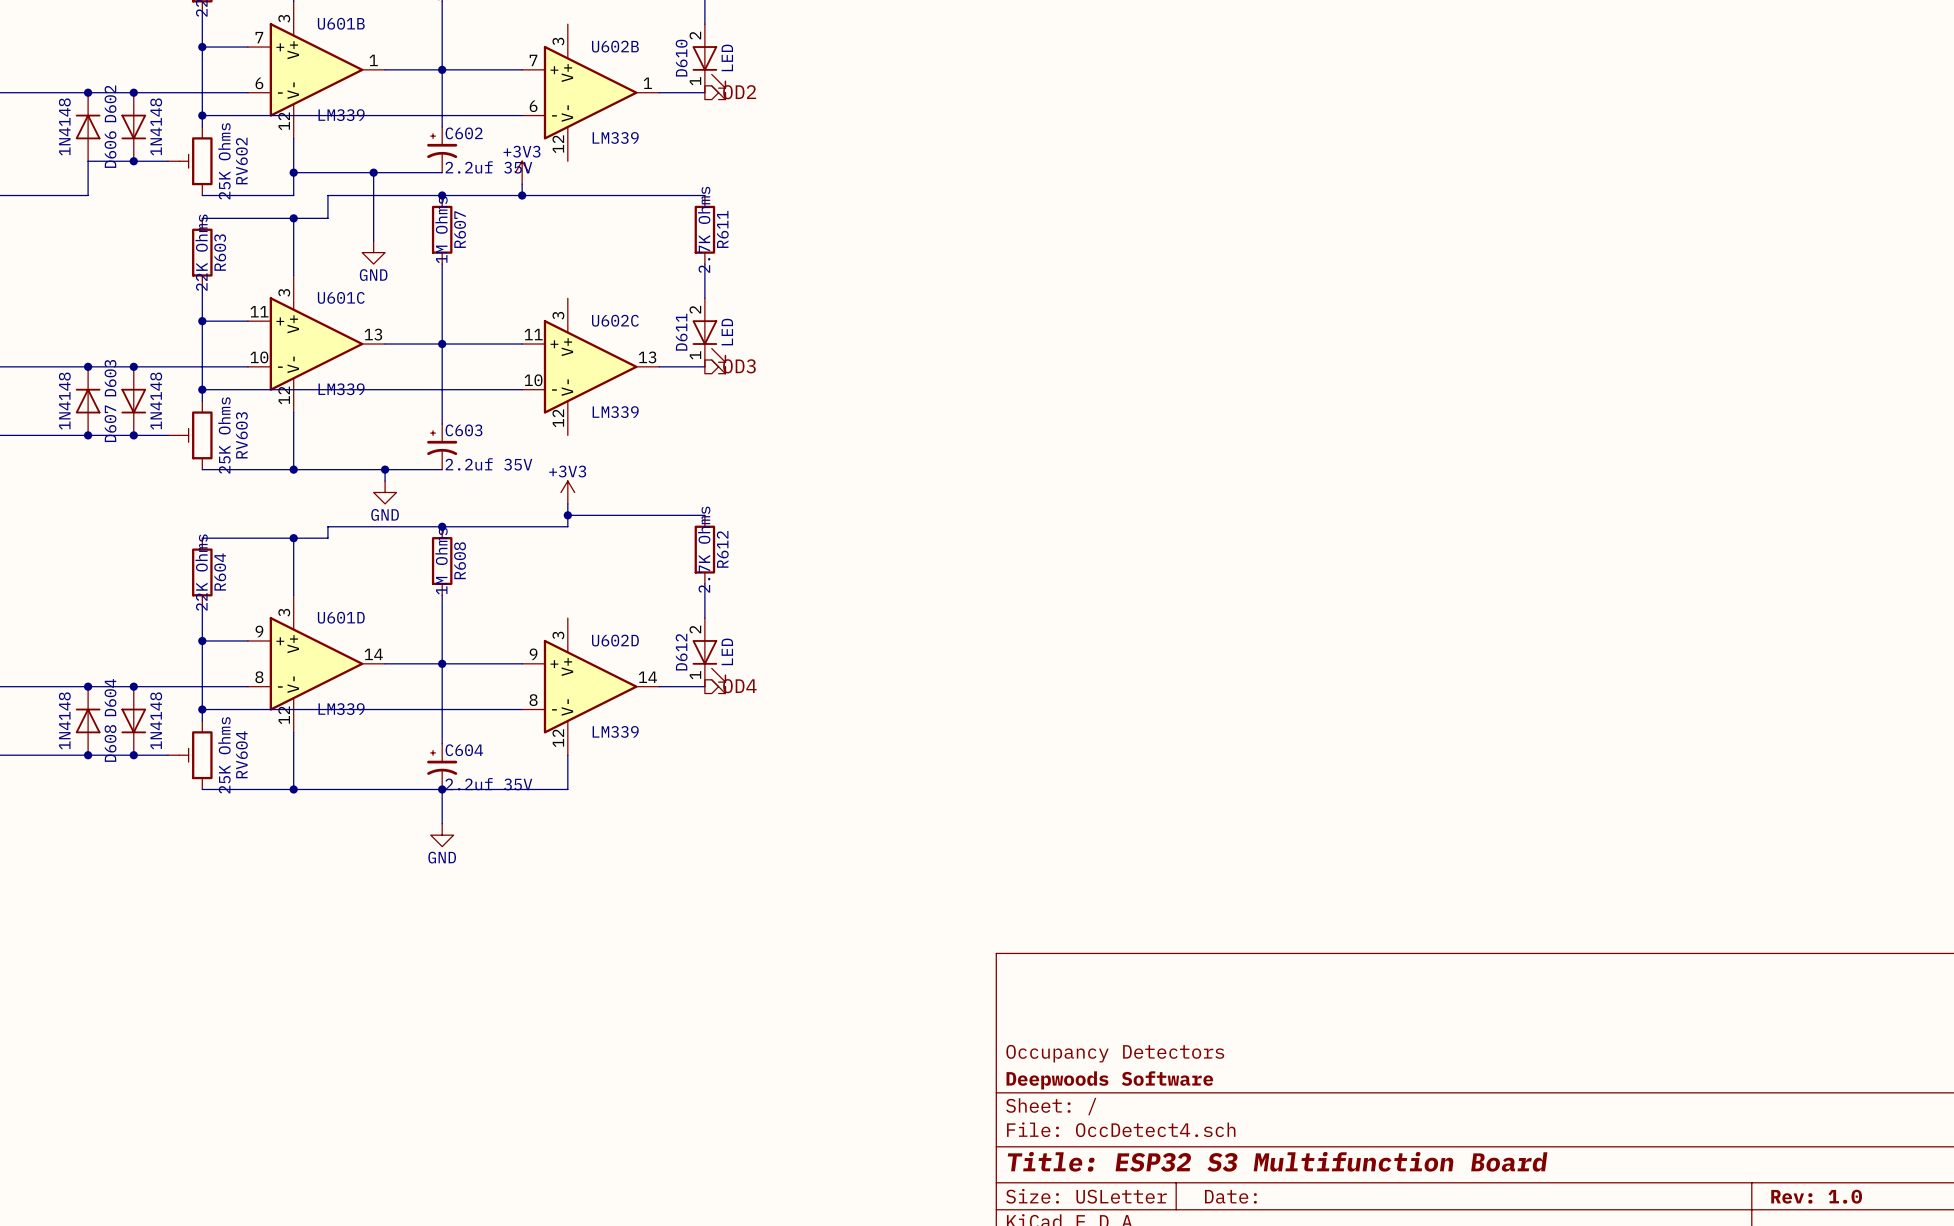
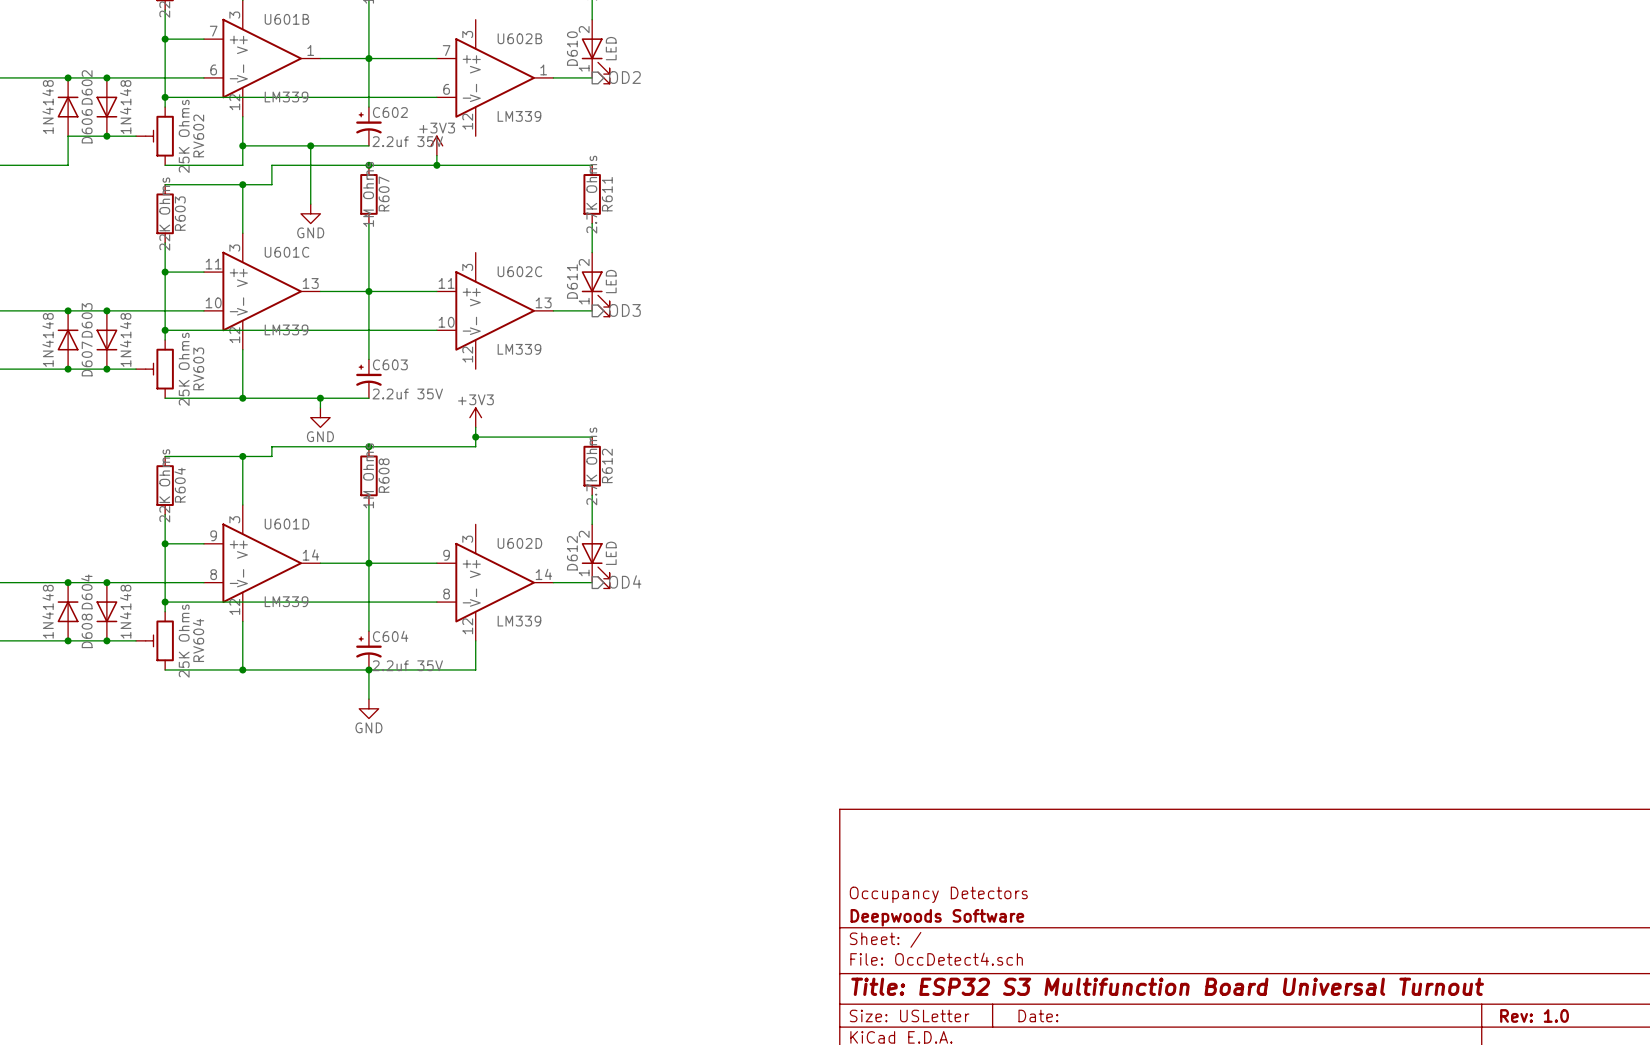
title block: Title: ESP32 S3 Multifunction Board (1277, 1161) -> Title: ESP32 S3 Multifunction Board Universal Turnout (1167, 986)

